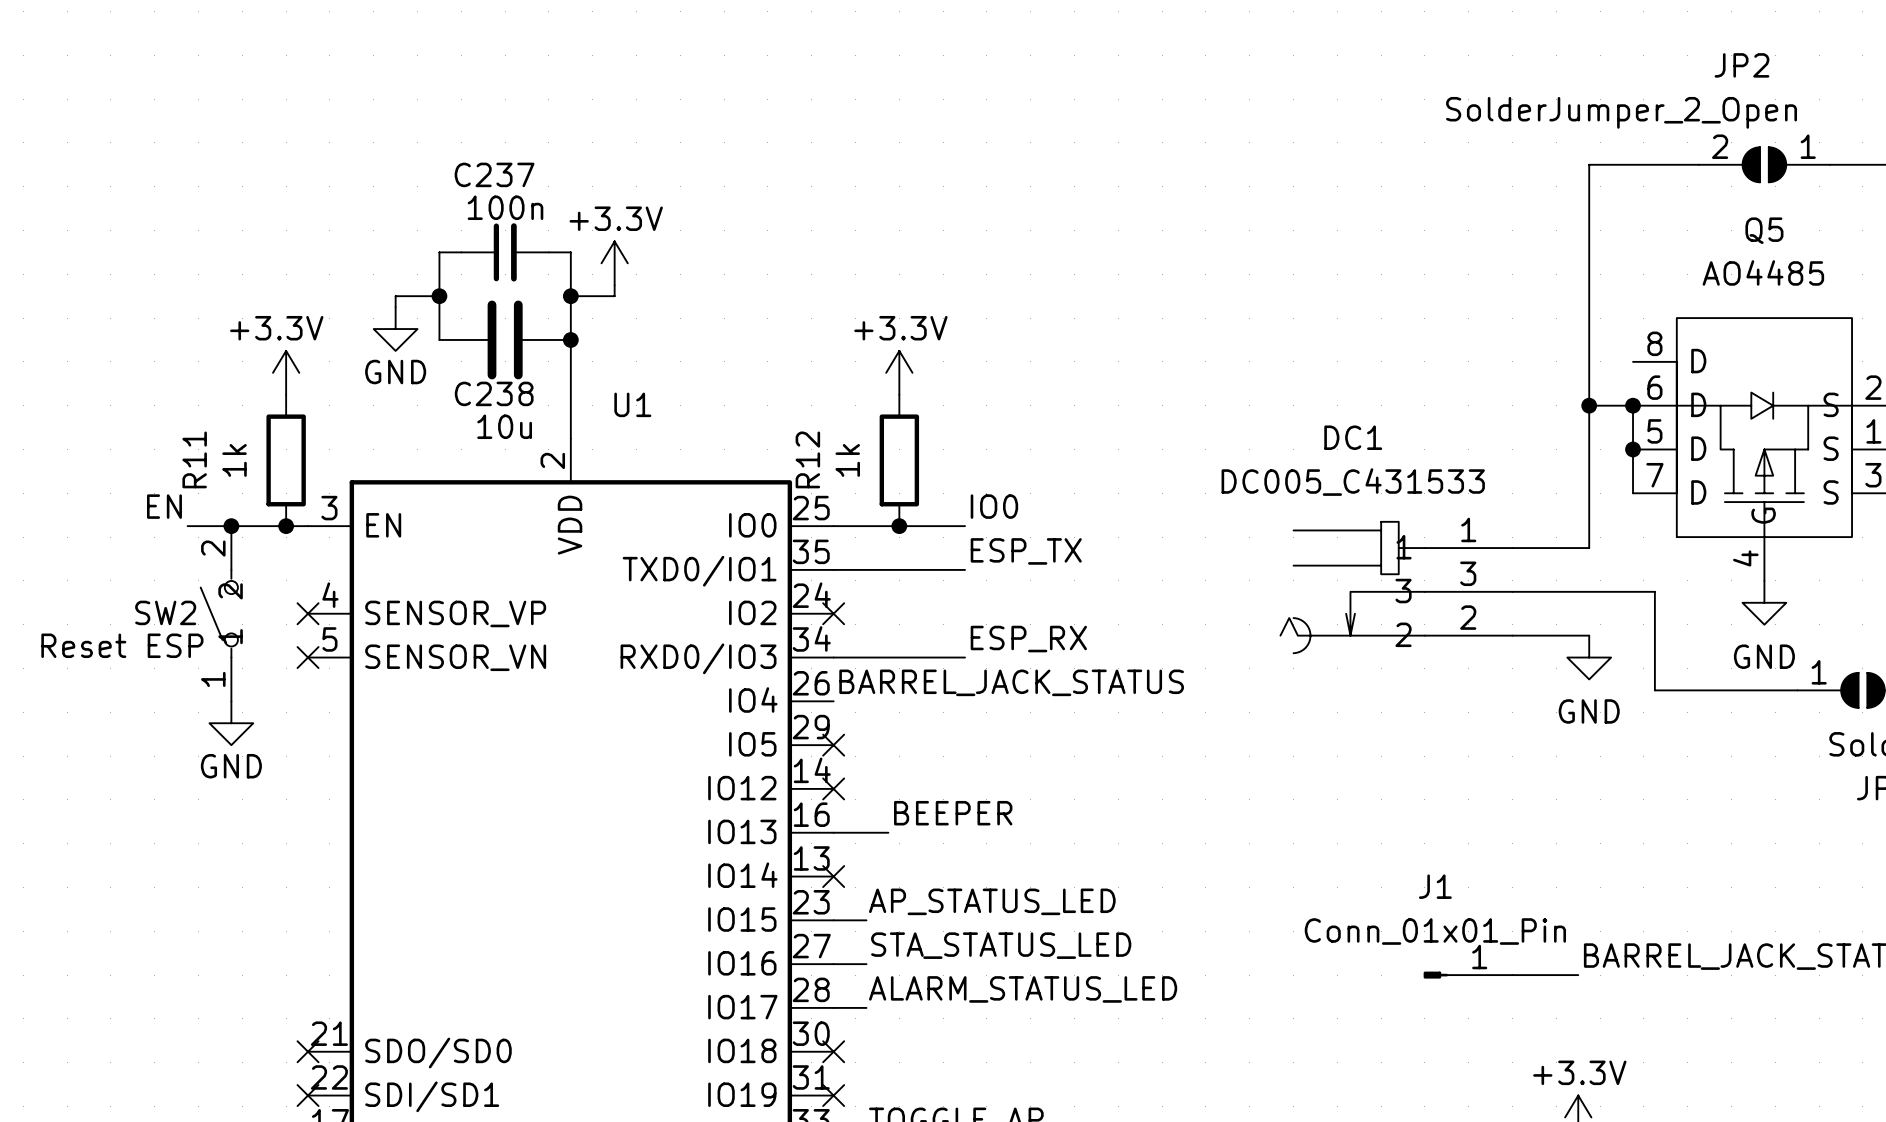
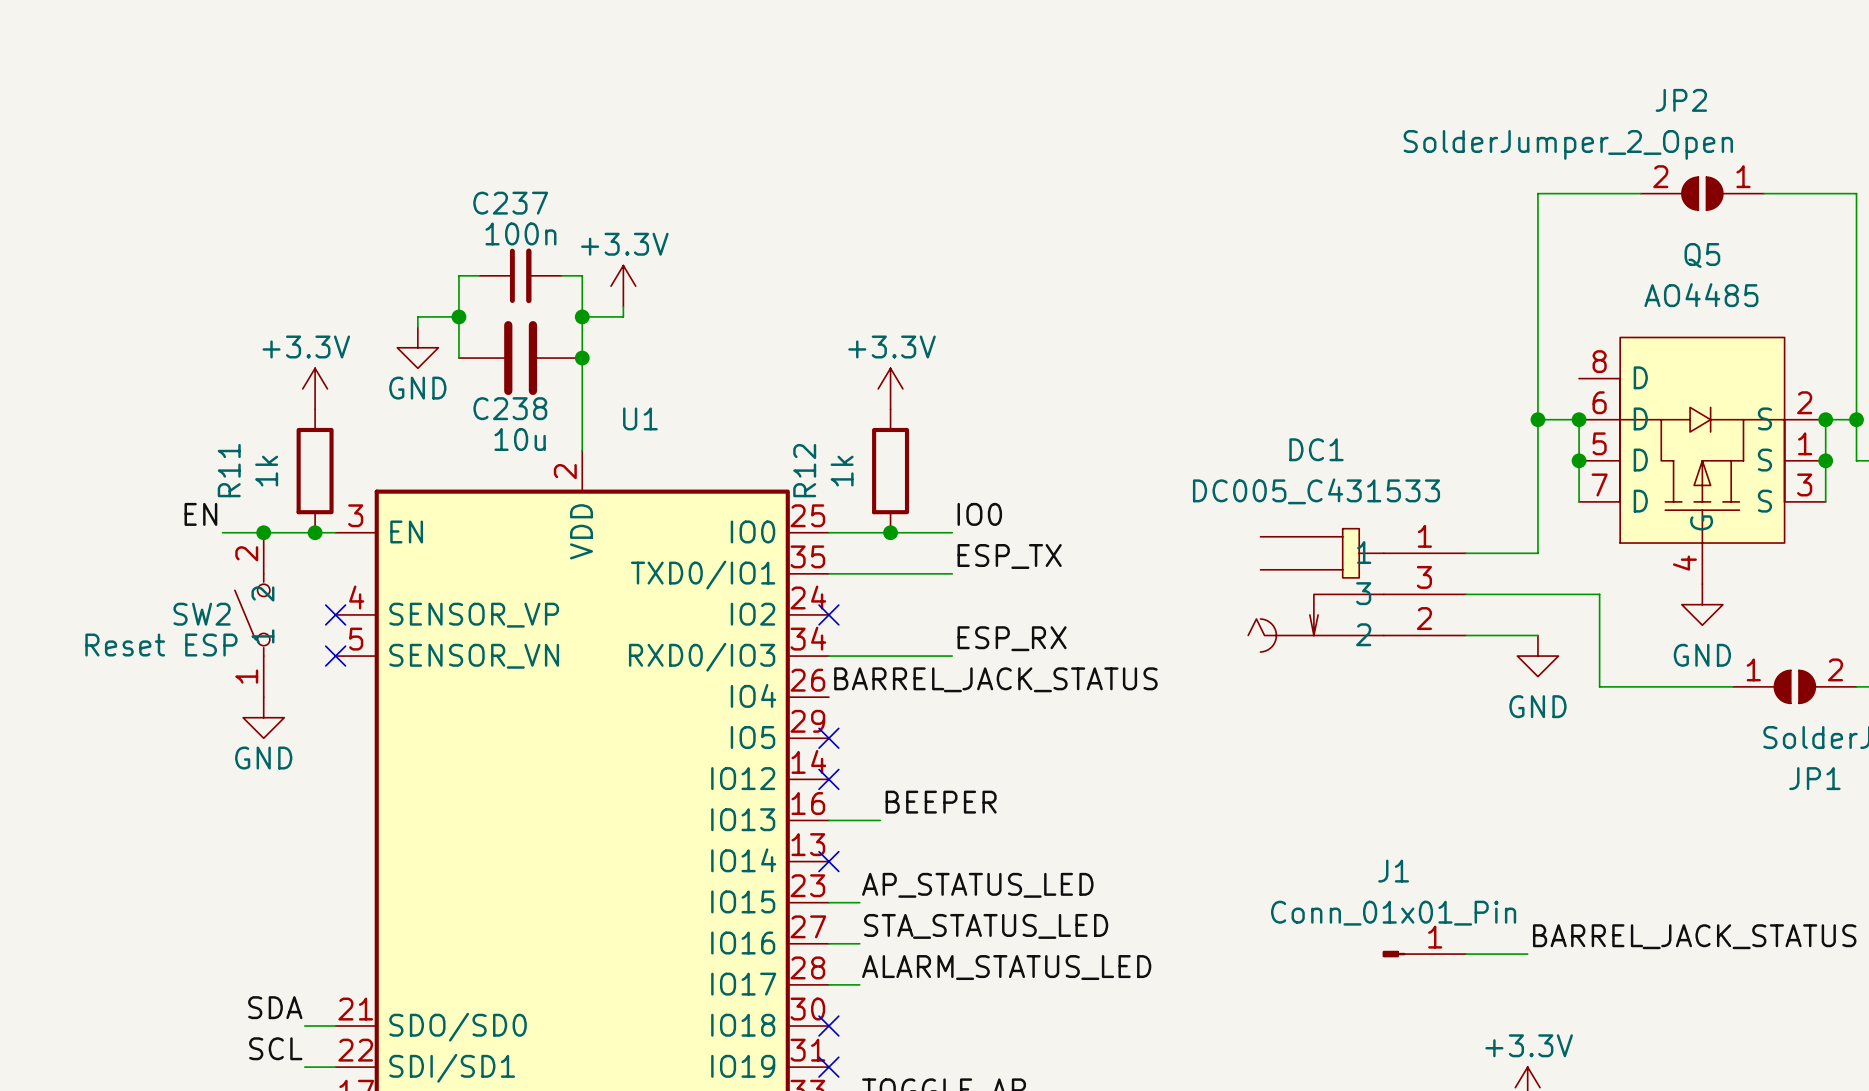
label: none -> SDA (275, 1007)
wire: none -> (304, 1026) (335, 1026)
no-connect mark: (308, 1051) -> none
label: none -> SCL (275, 1048)
wire: none -> (304, 1067) (335, 1067)
no-connect mark: (308, 1095) -> none

